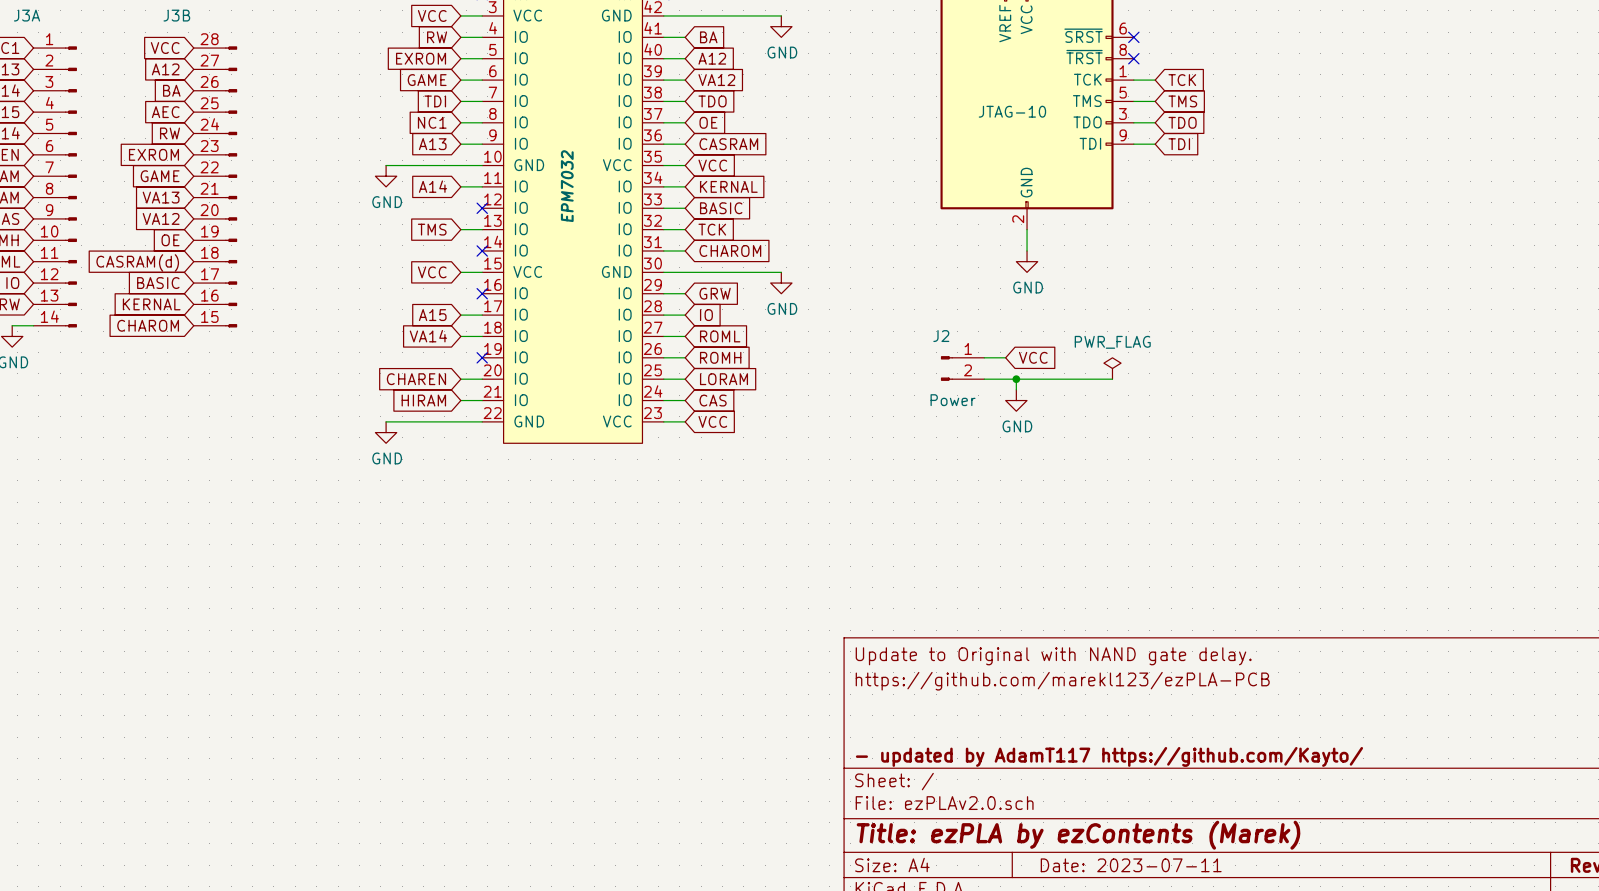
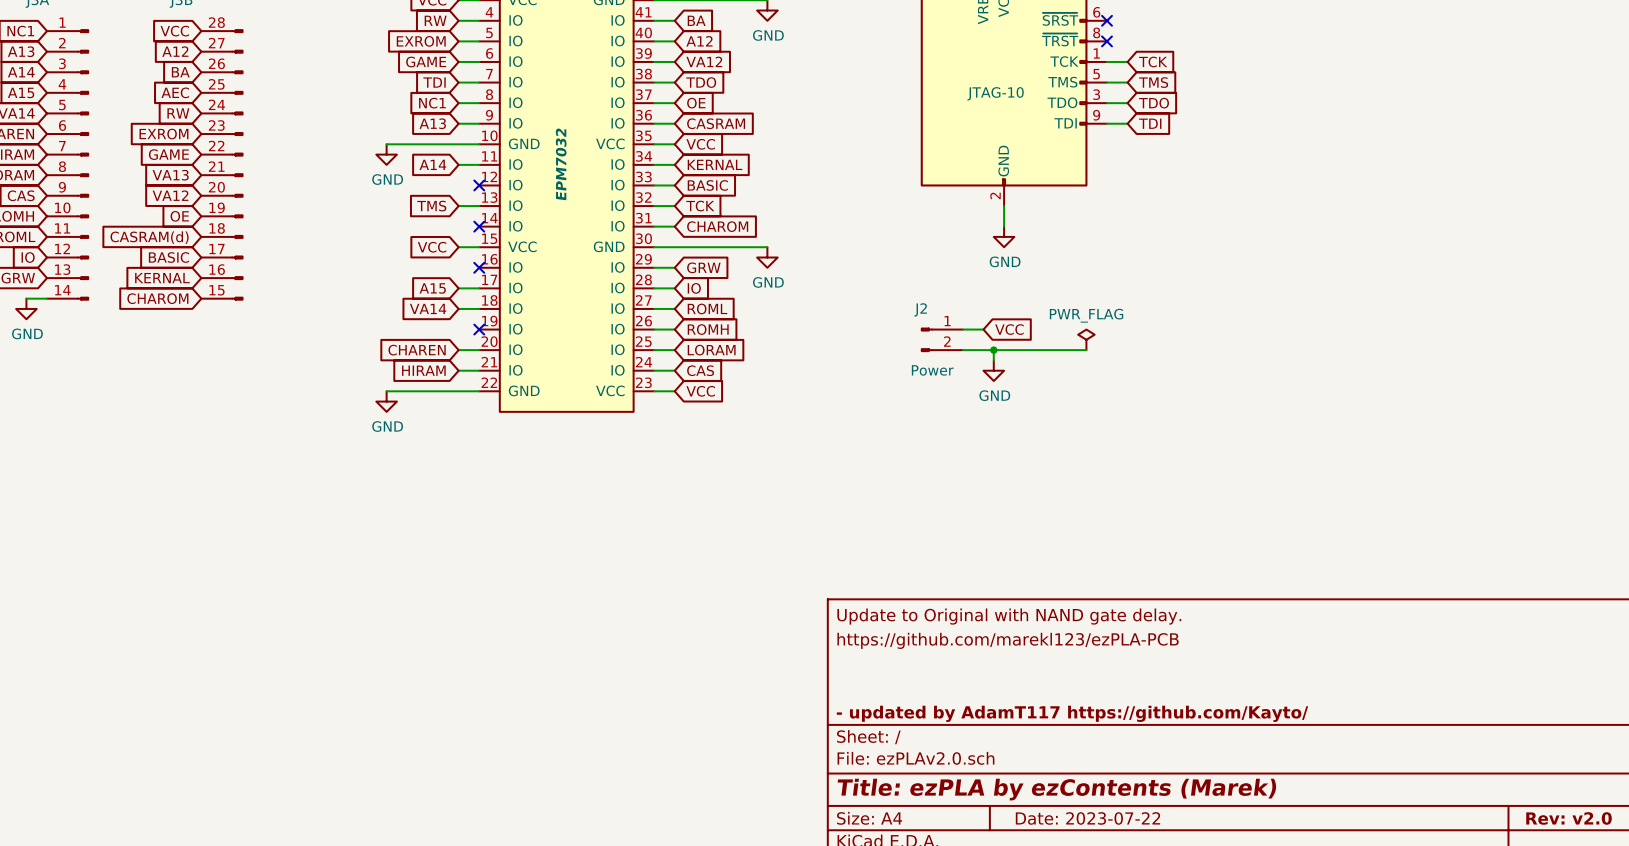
title block: Date: 2023-07-11 (1131, 865) -> Date: 2023-07-22 (1088, 818)

